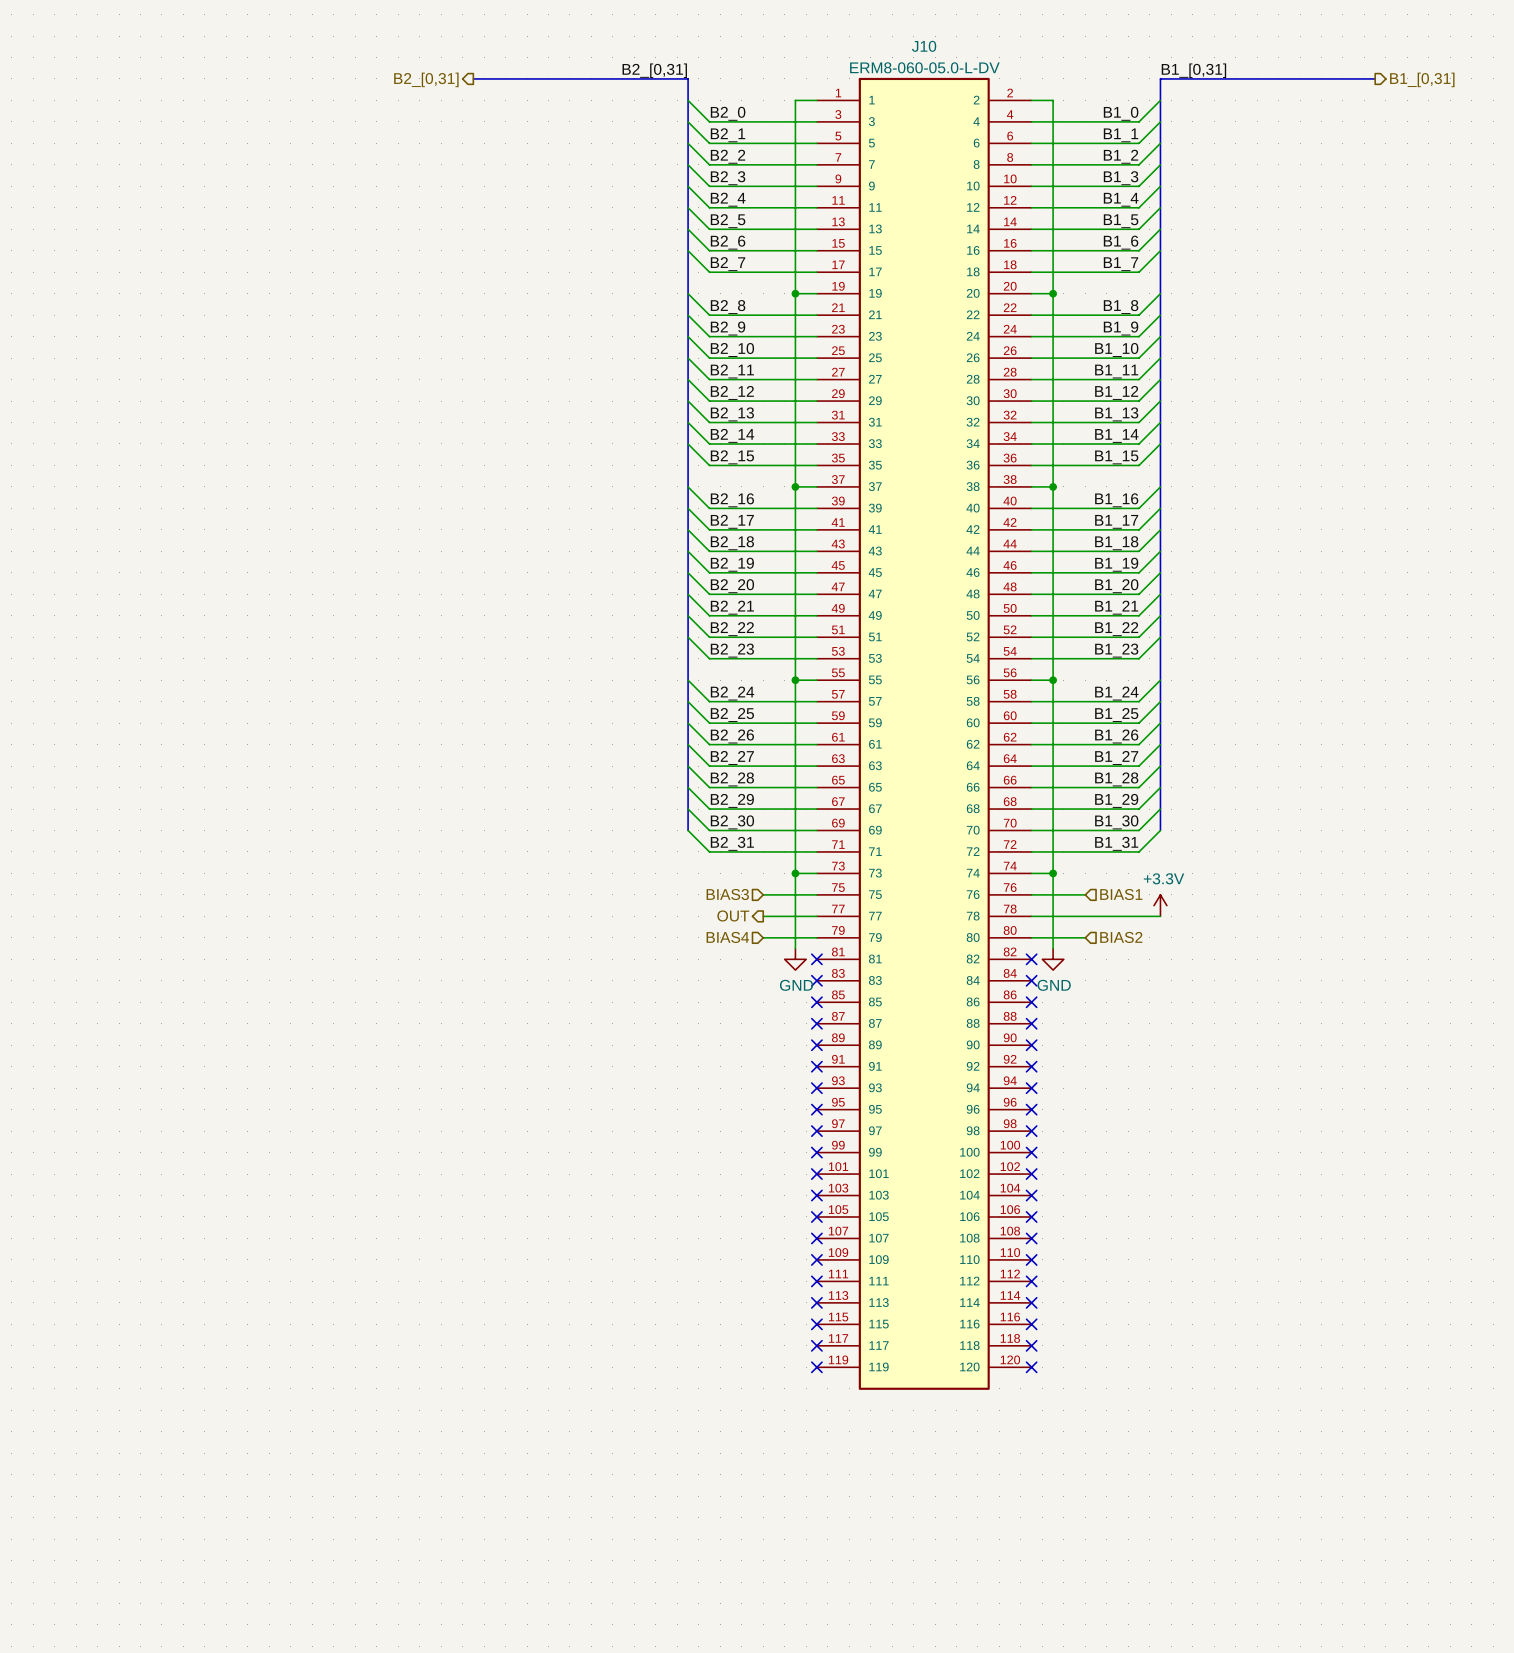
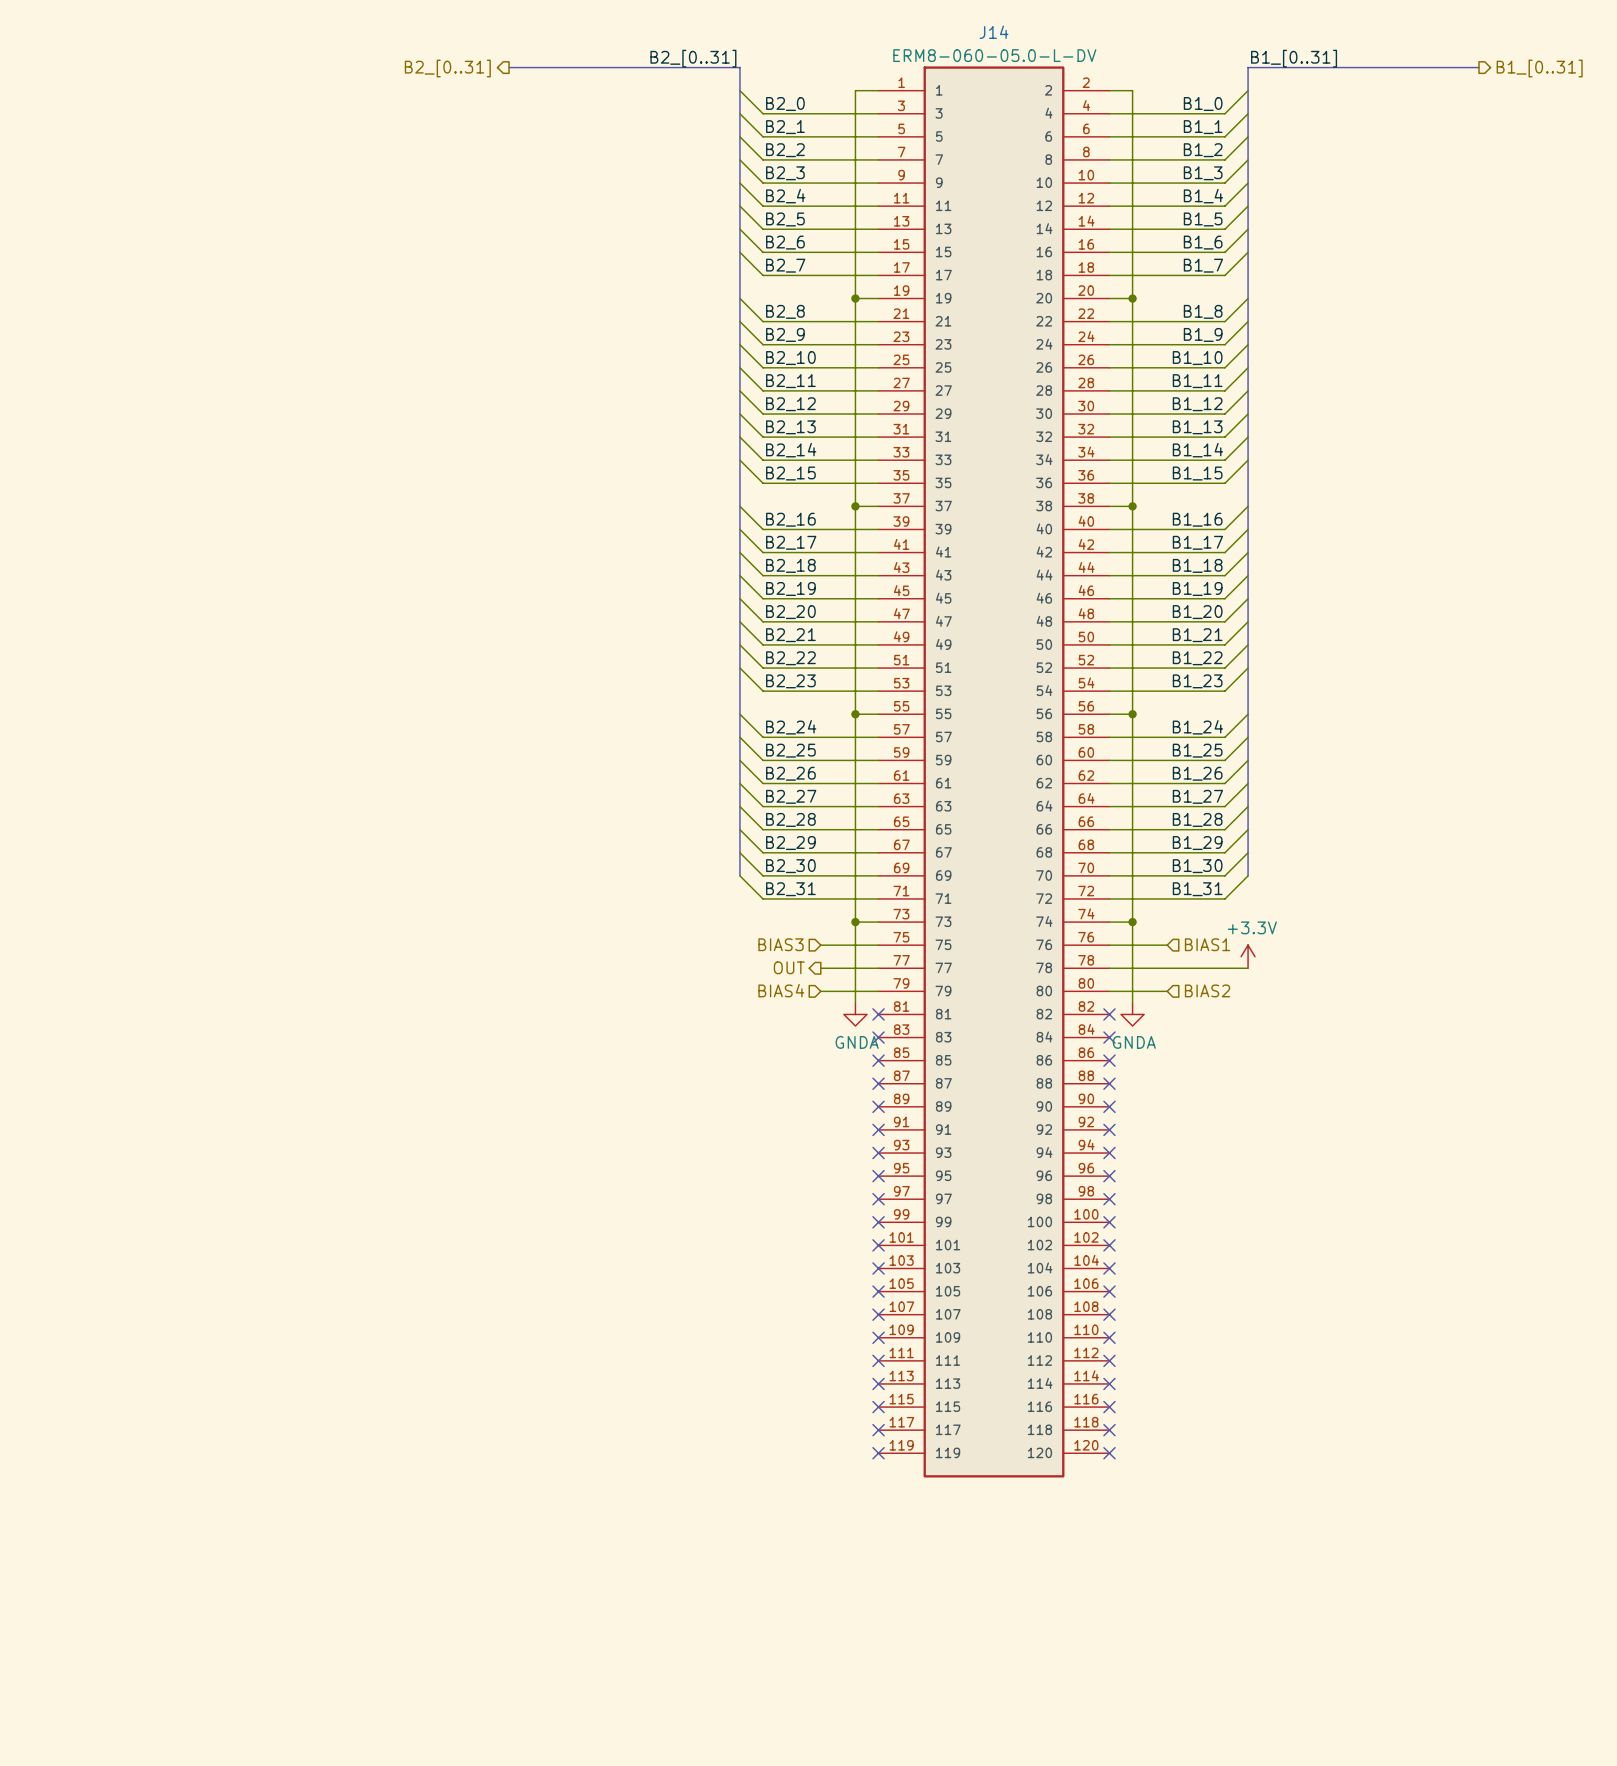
J10 name: J10 (924, 46) -> J14 (994, 32)
label: B2_[0,31] (654, 70) -> B2_[0..31] (693, 58)
label: B1_[0,31] (1193, 70) -> B1_[0..31] (1294, 58)
hierarchical label: B2_[0,31] (426, 79) -> B2_[0..31] (447, 68)
hierarchical label: B1_[0,31] (1422, 79) -> B1_[0..31] (1539, 68)
power symbol: GND (795, 959) -> GNDA (855, 1014)
power symbol: GND (1053, 959) -> GNDA (1132, 1014)

